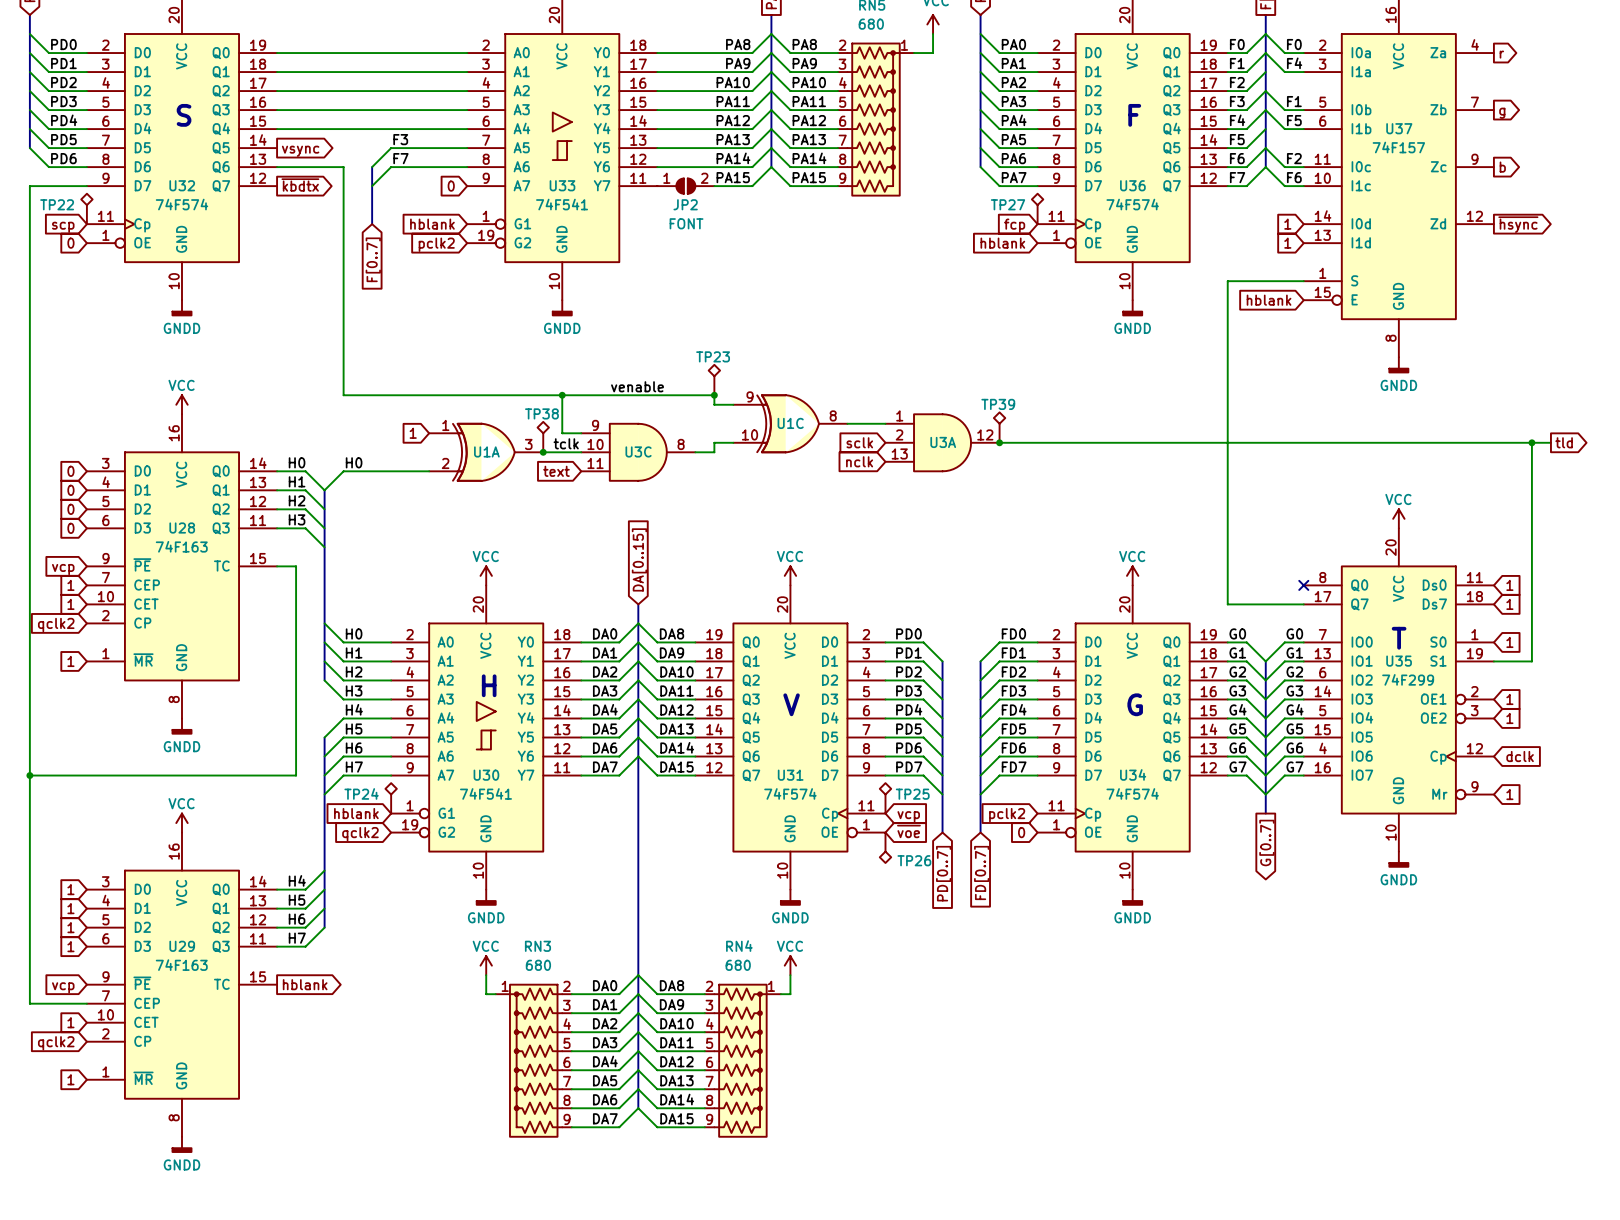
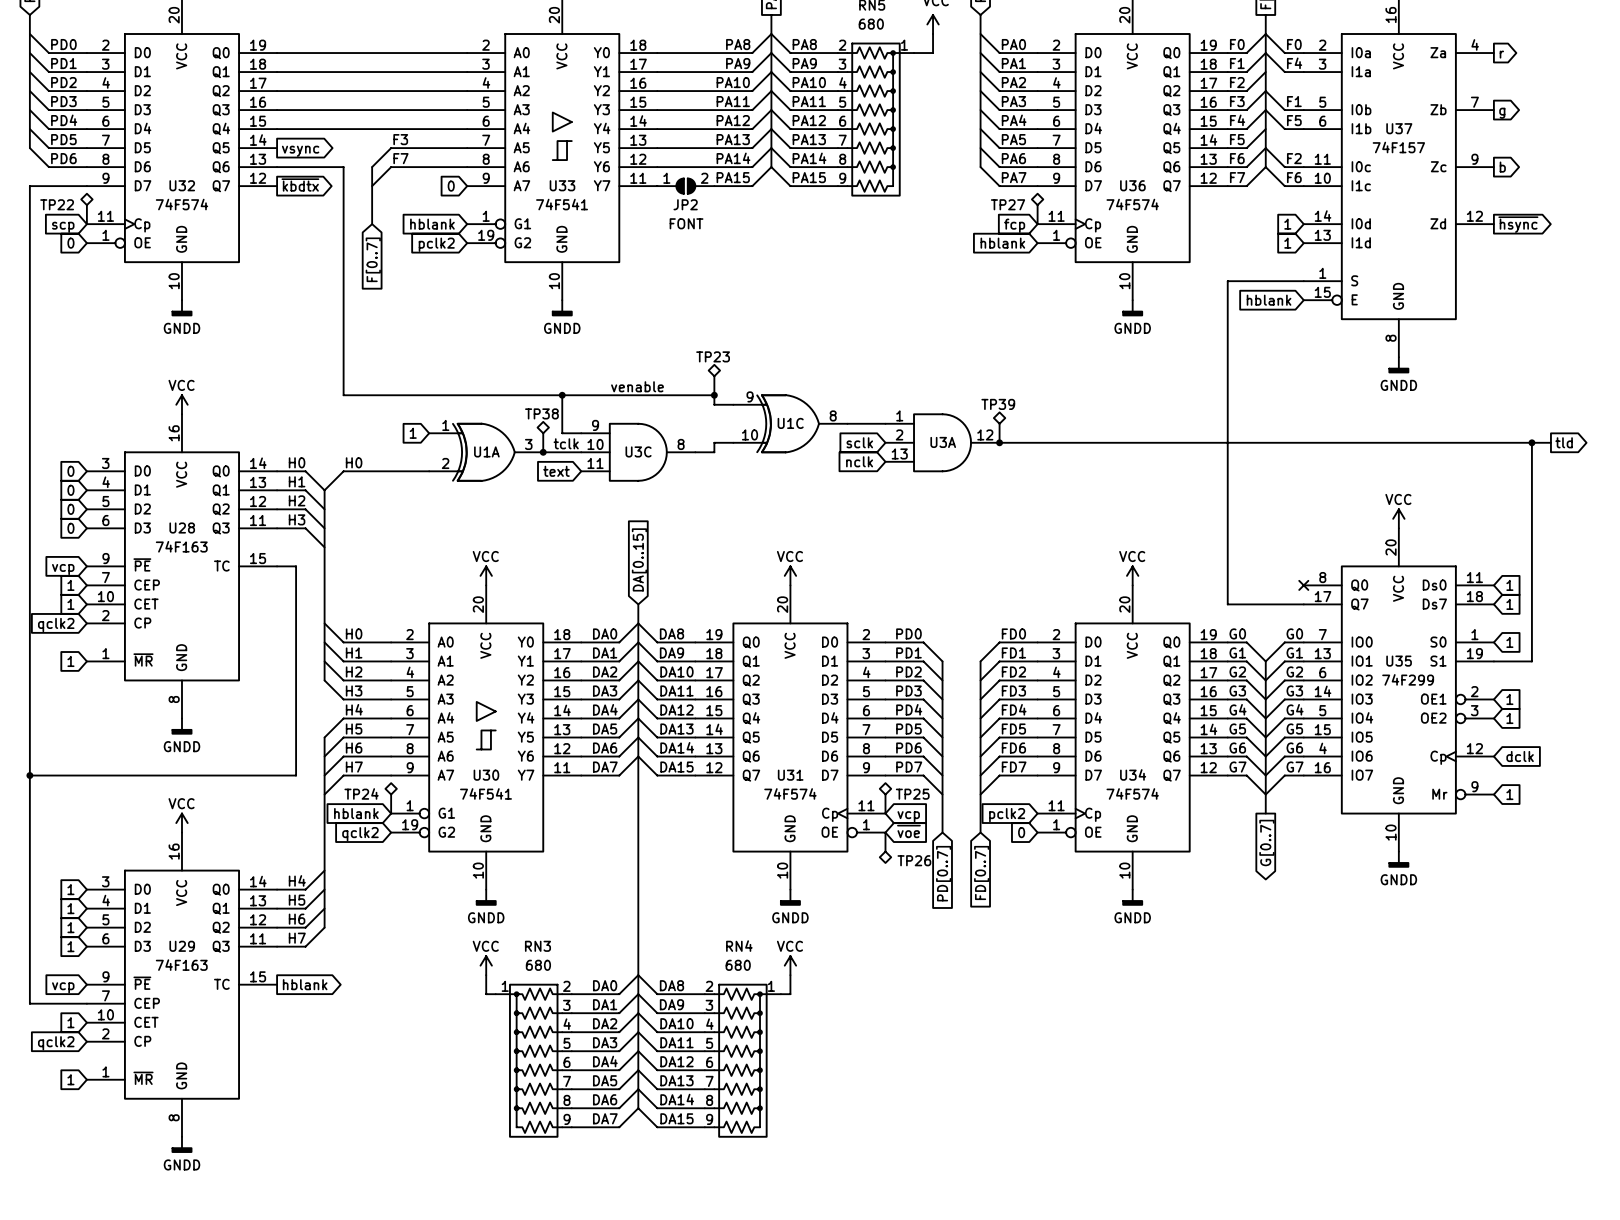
text: S (184, 115) -> none
text: F (1134, 115) -> none
text: T (1399, 638) -> none
text: H (489, 685) -> none
text: V (791, 704) -> none
text: G (1135, 704) -> none

